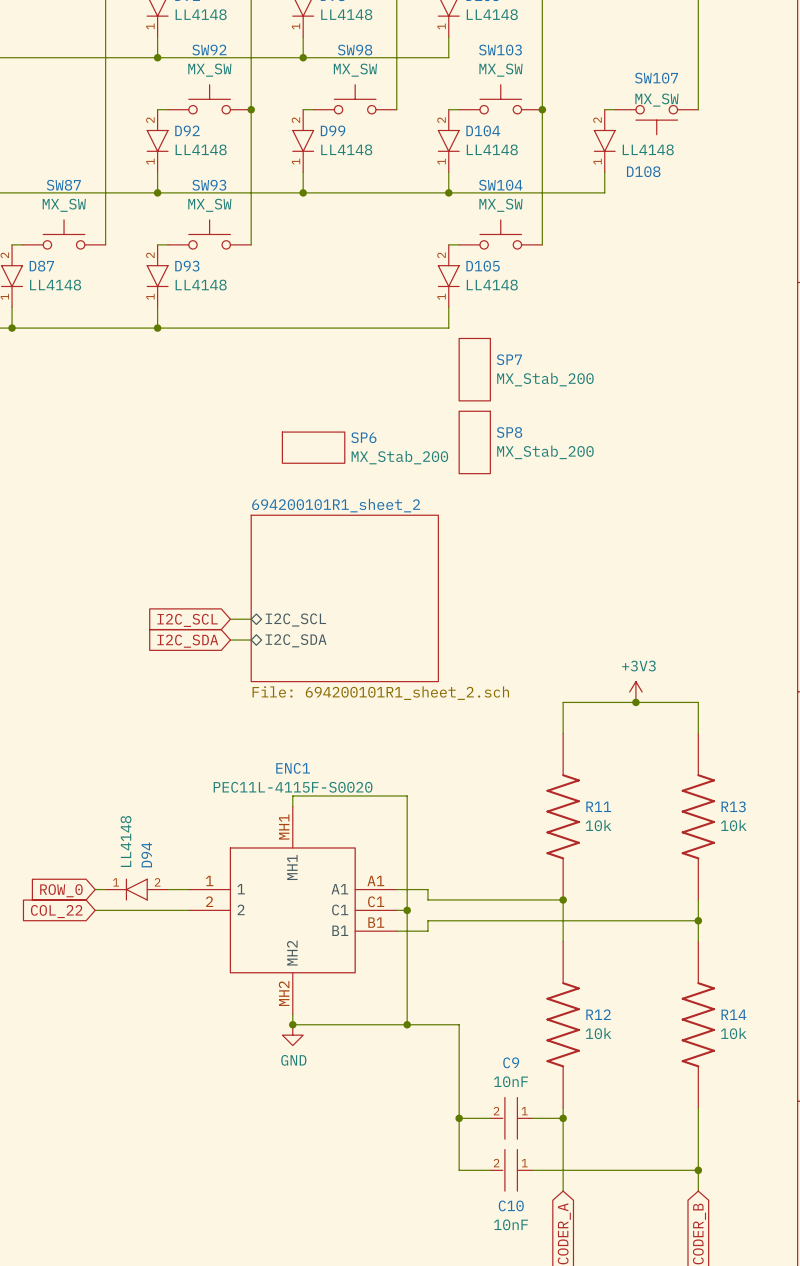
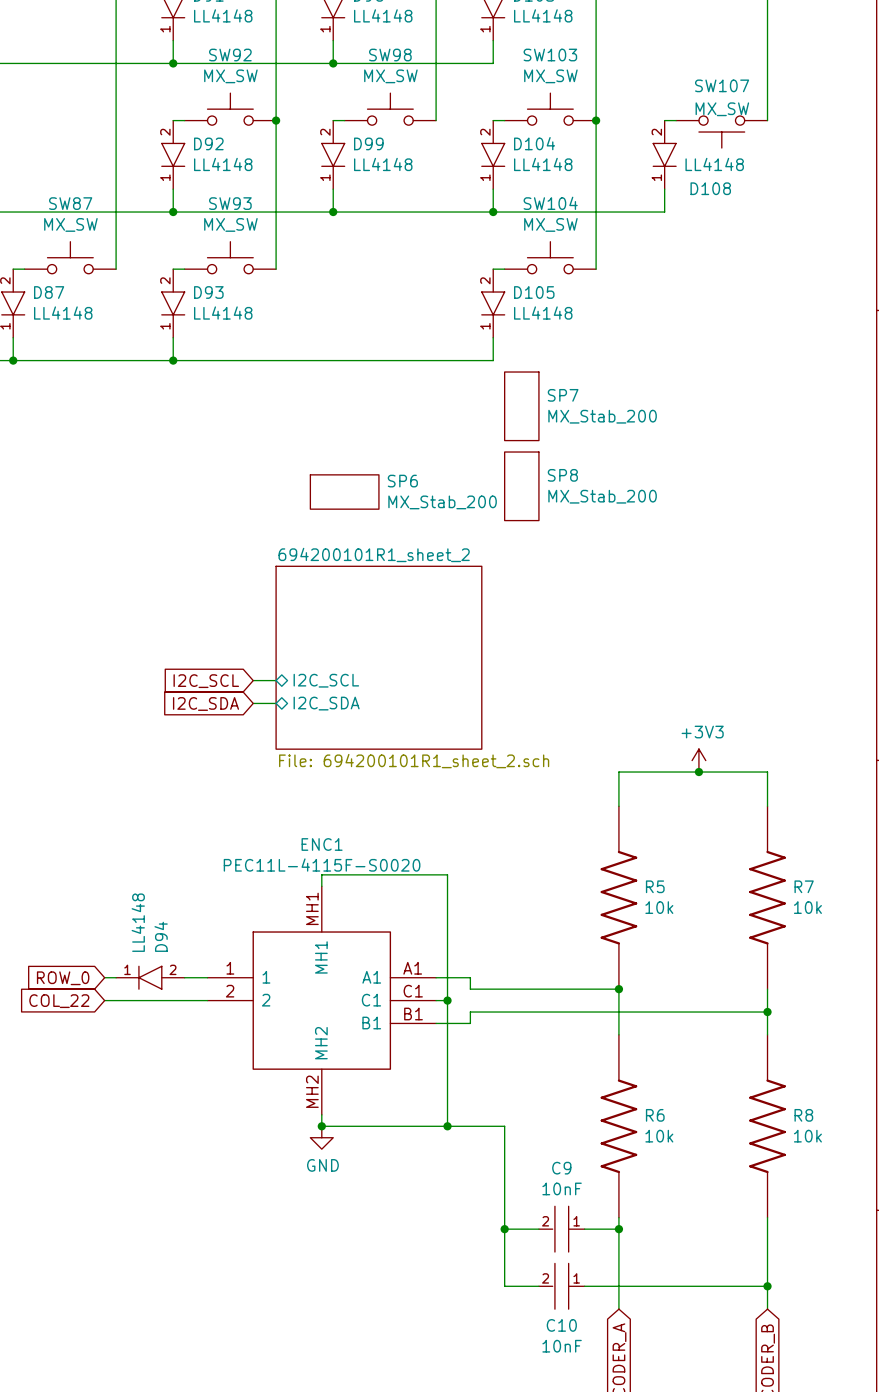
R11 name: R11 (598, 806) -> R5 (655, 886)
R13 name: R13 (733, 806) -> R7 (804, 886)
R12 name: R12 (598, 1014) -> R6 (655, 1115)
R14 name: R14 (733, 1014) -> R8 (803, 1115)

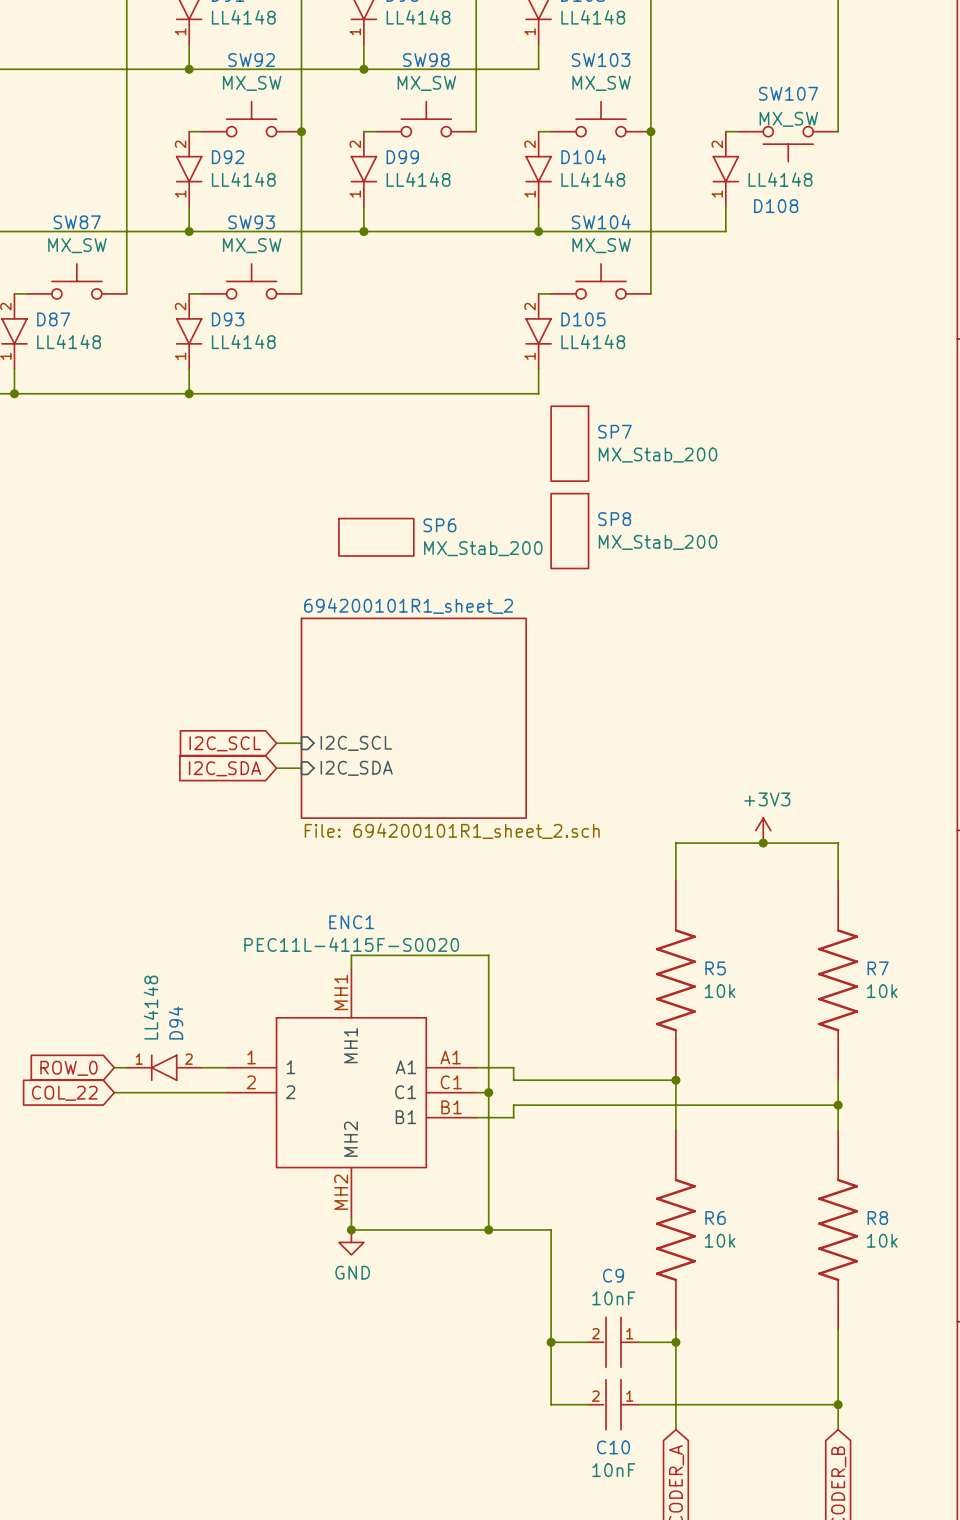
sheet pin shape: bidirectional (326, 680) -> input (356, 743)
sheet pin shape: bidirectional (326, 703) -> input (356, 768)

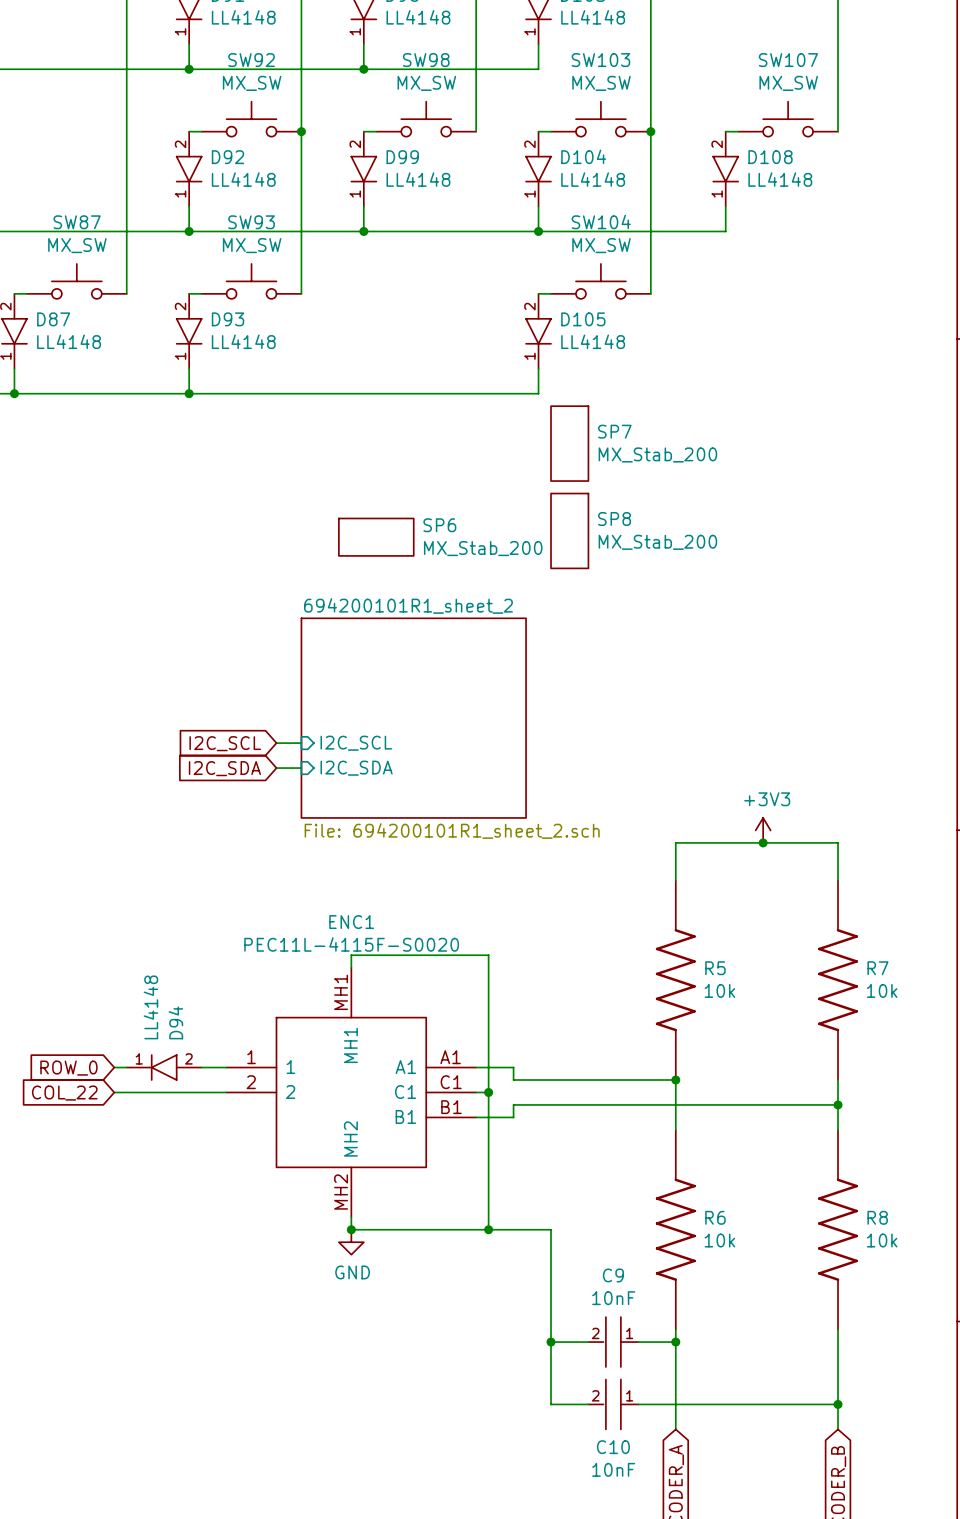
SW107 rotation: 0° (788, 144) -> 180° (788, 119)
D108 name position: D108 (776, 206) -> D108 (770, 157)

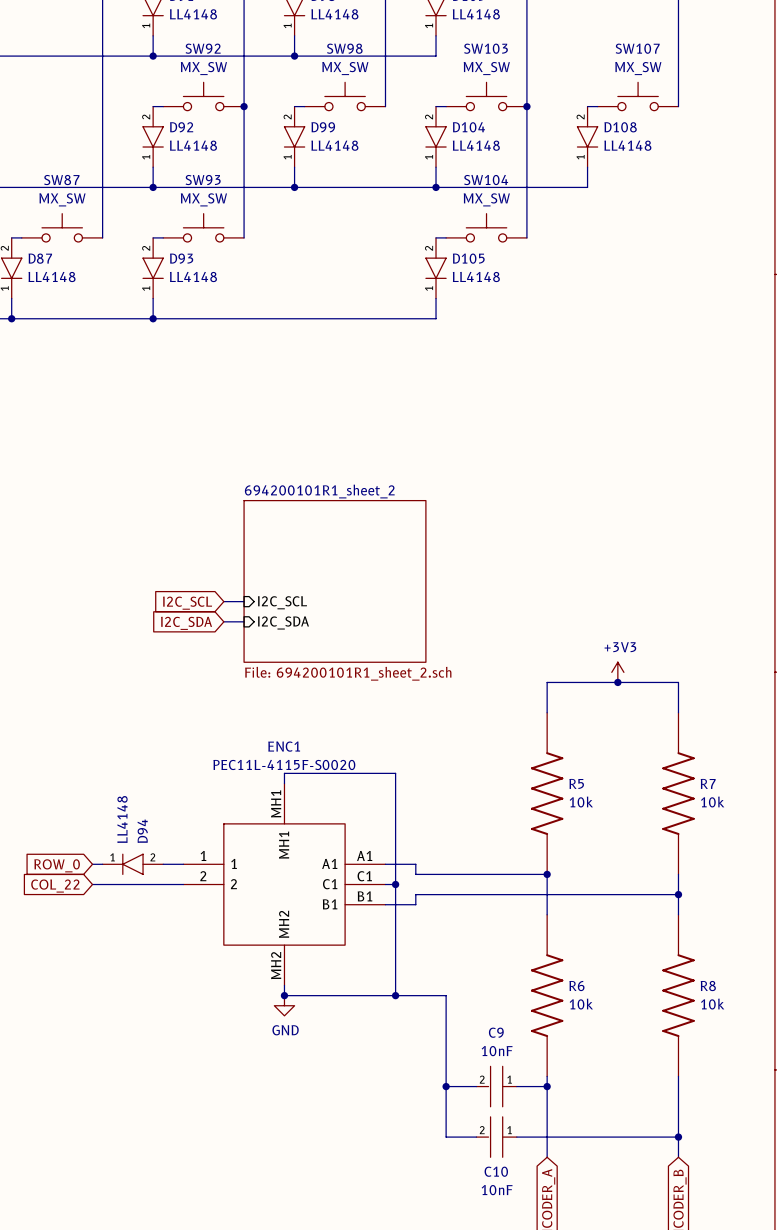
SP7: MX_Stab_200 (569, 443) -> none
SP8: MX_Stab_200 (569, 530) -> none
SP6: MX_Stab_200 (376, 537) -> none

